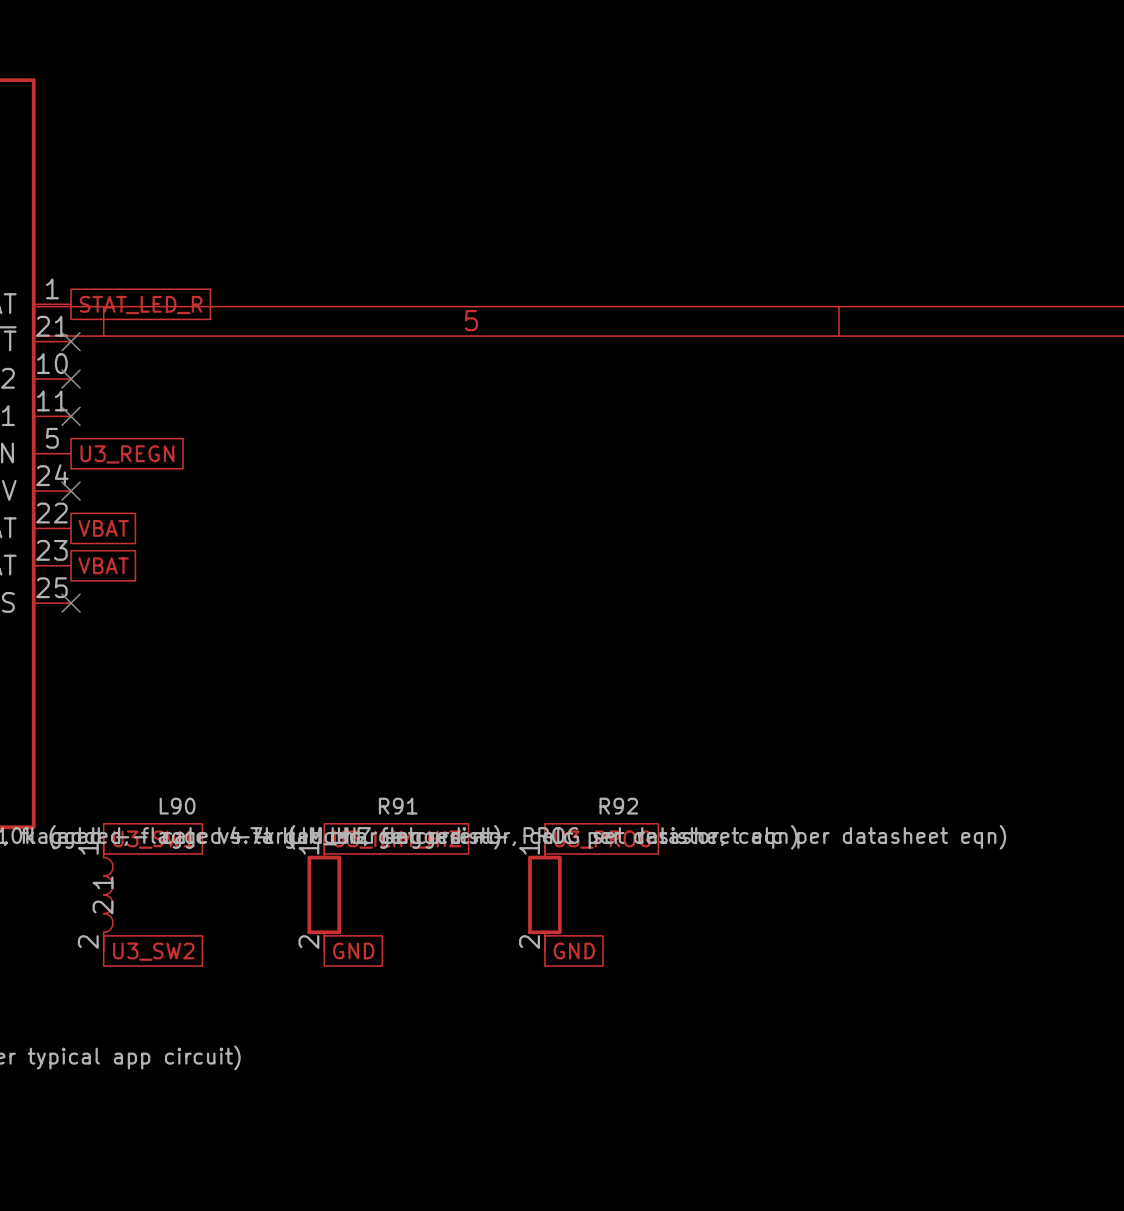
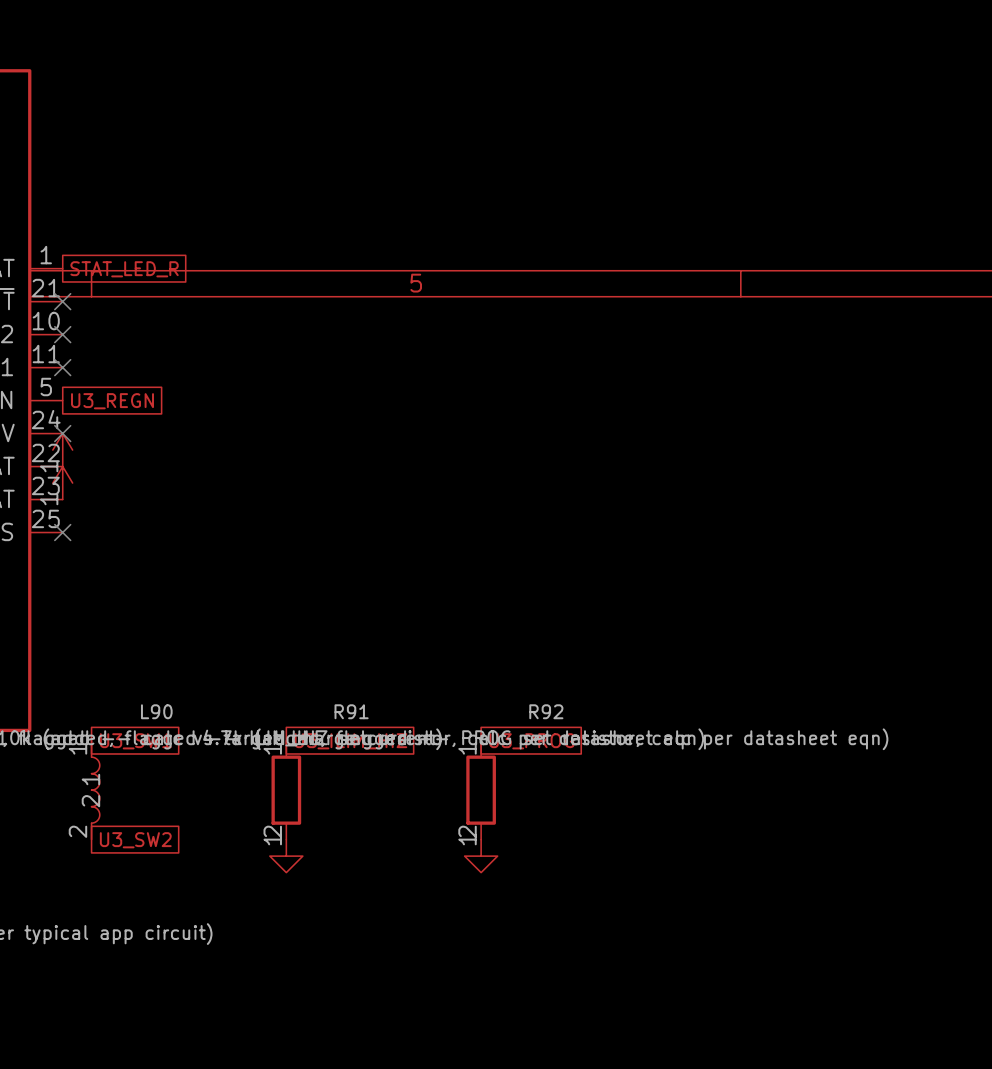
power symbol: none -> (62, 450)
global label: VBAT (103, 528) -> none
power symbol: none -> (62, 483)
global label: VBAT (103, 565) -> none
global label: GND (353, 950) -> none
global label: GND (574, 950) -> none
power symbol: none -> (286, 856)
power symbol: none -> (481, 856)

